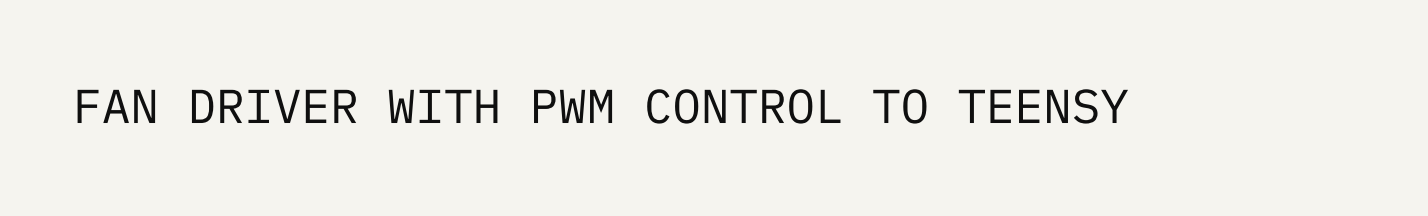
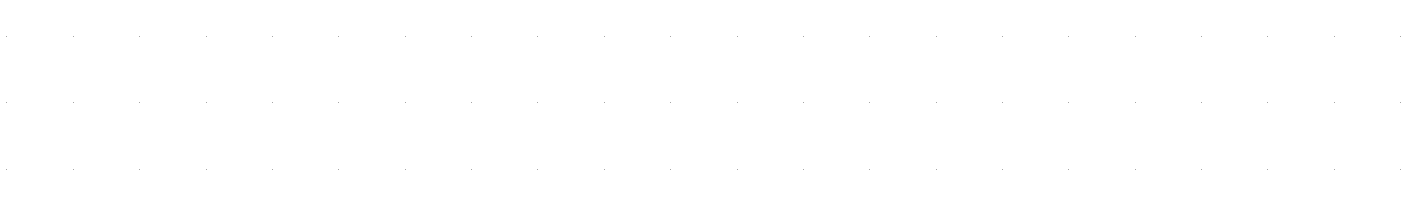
label: FAN DRIVER WITH PWM CONTROL TO TEENSY (602, 106) -> none

